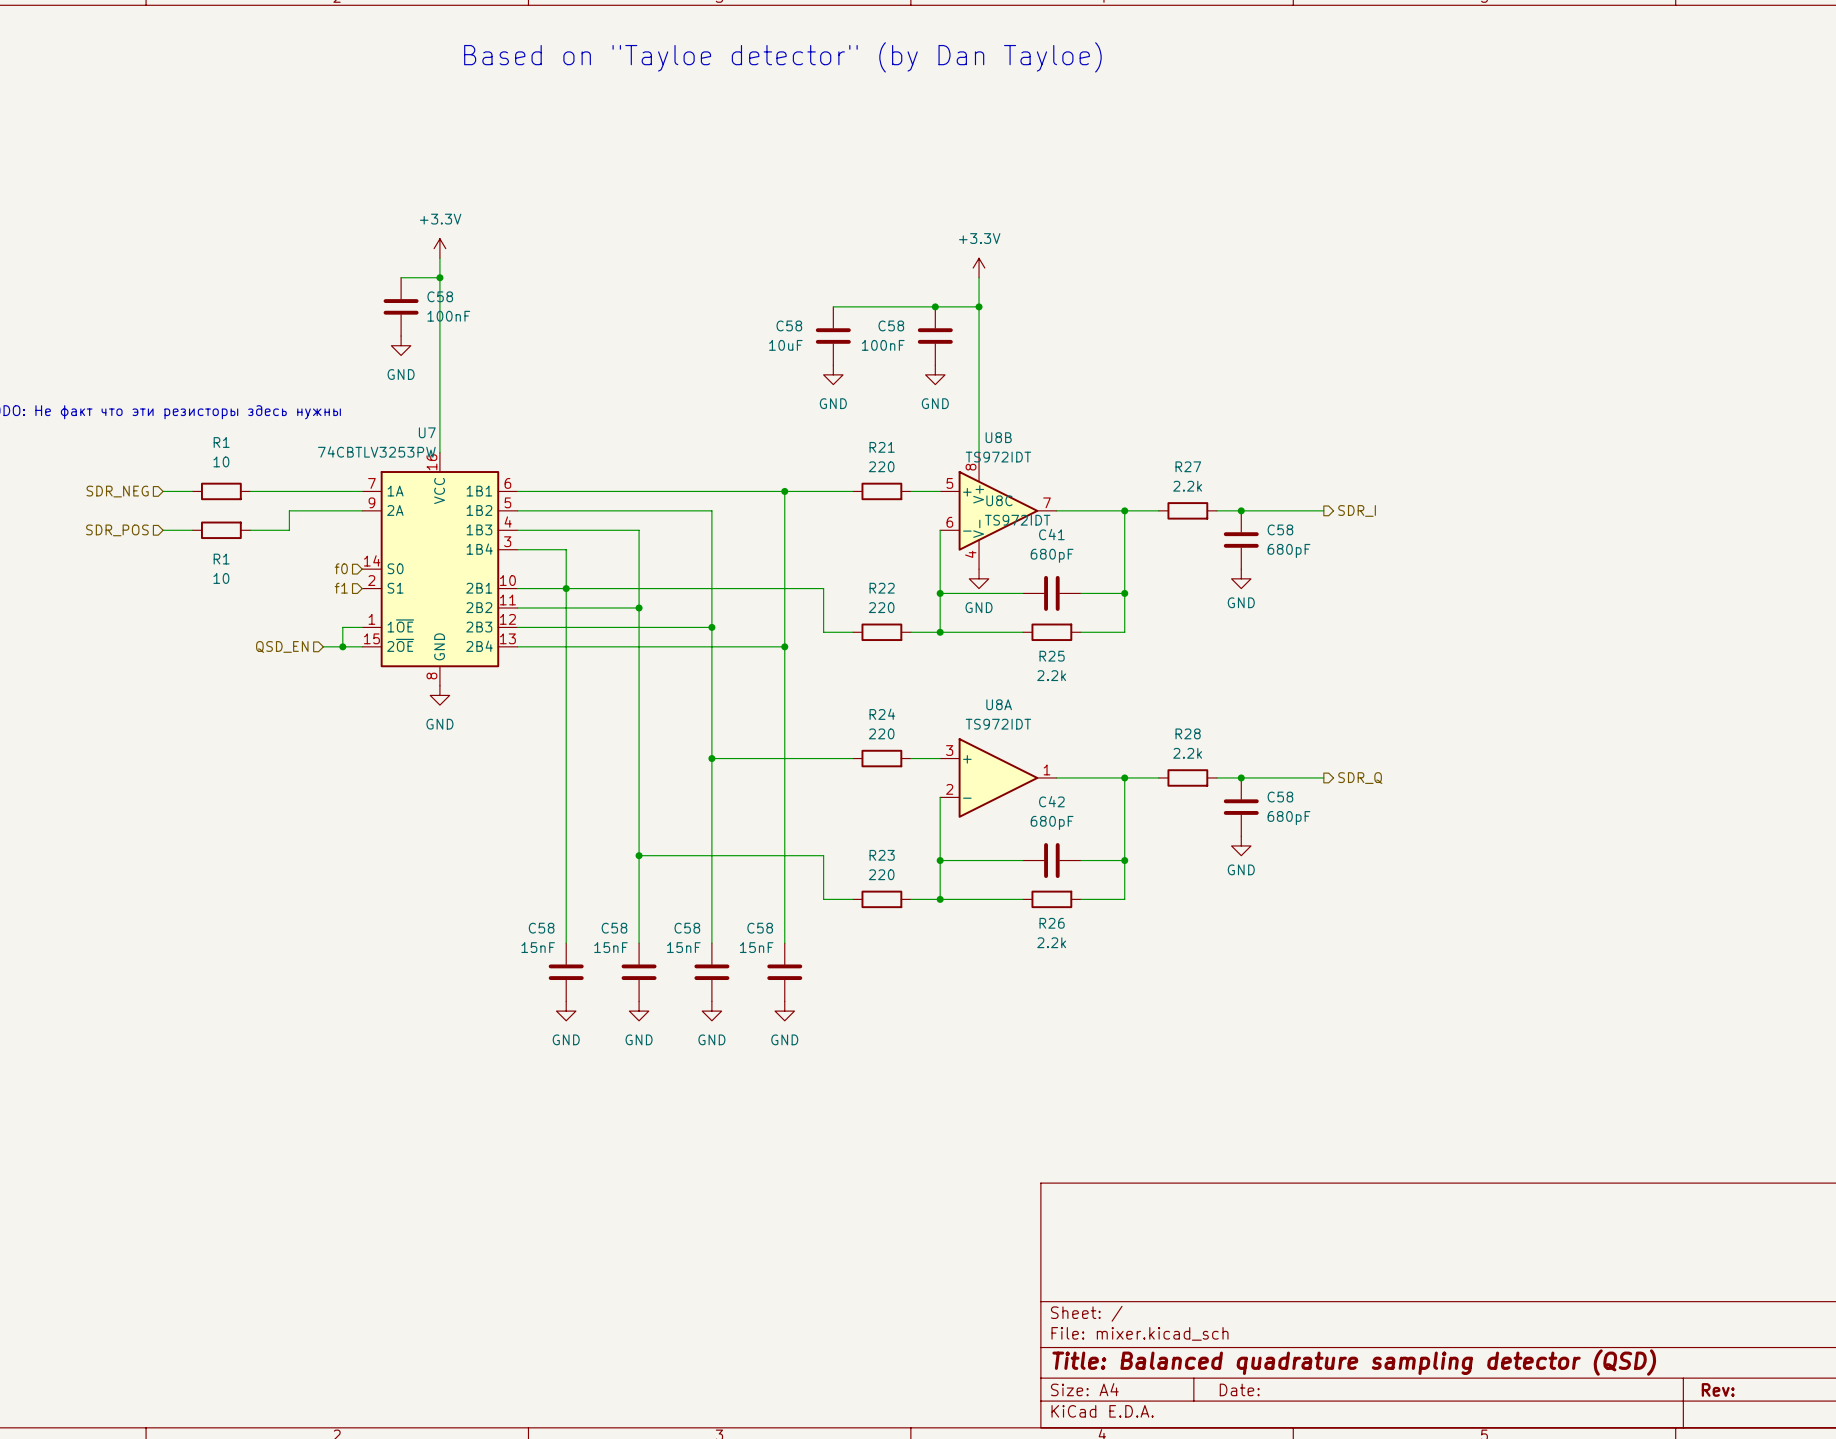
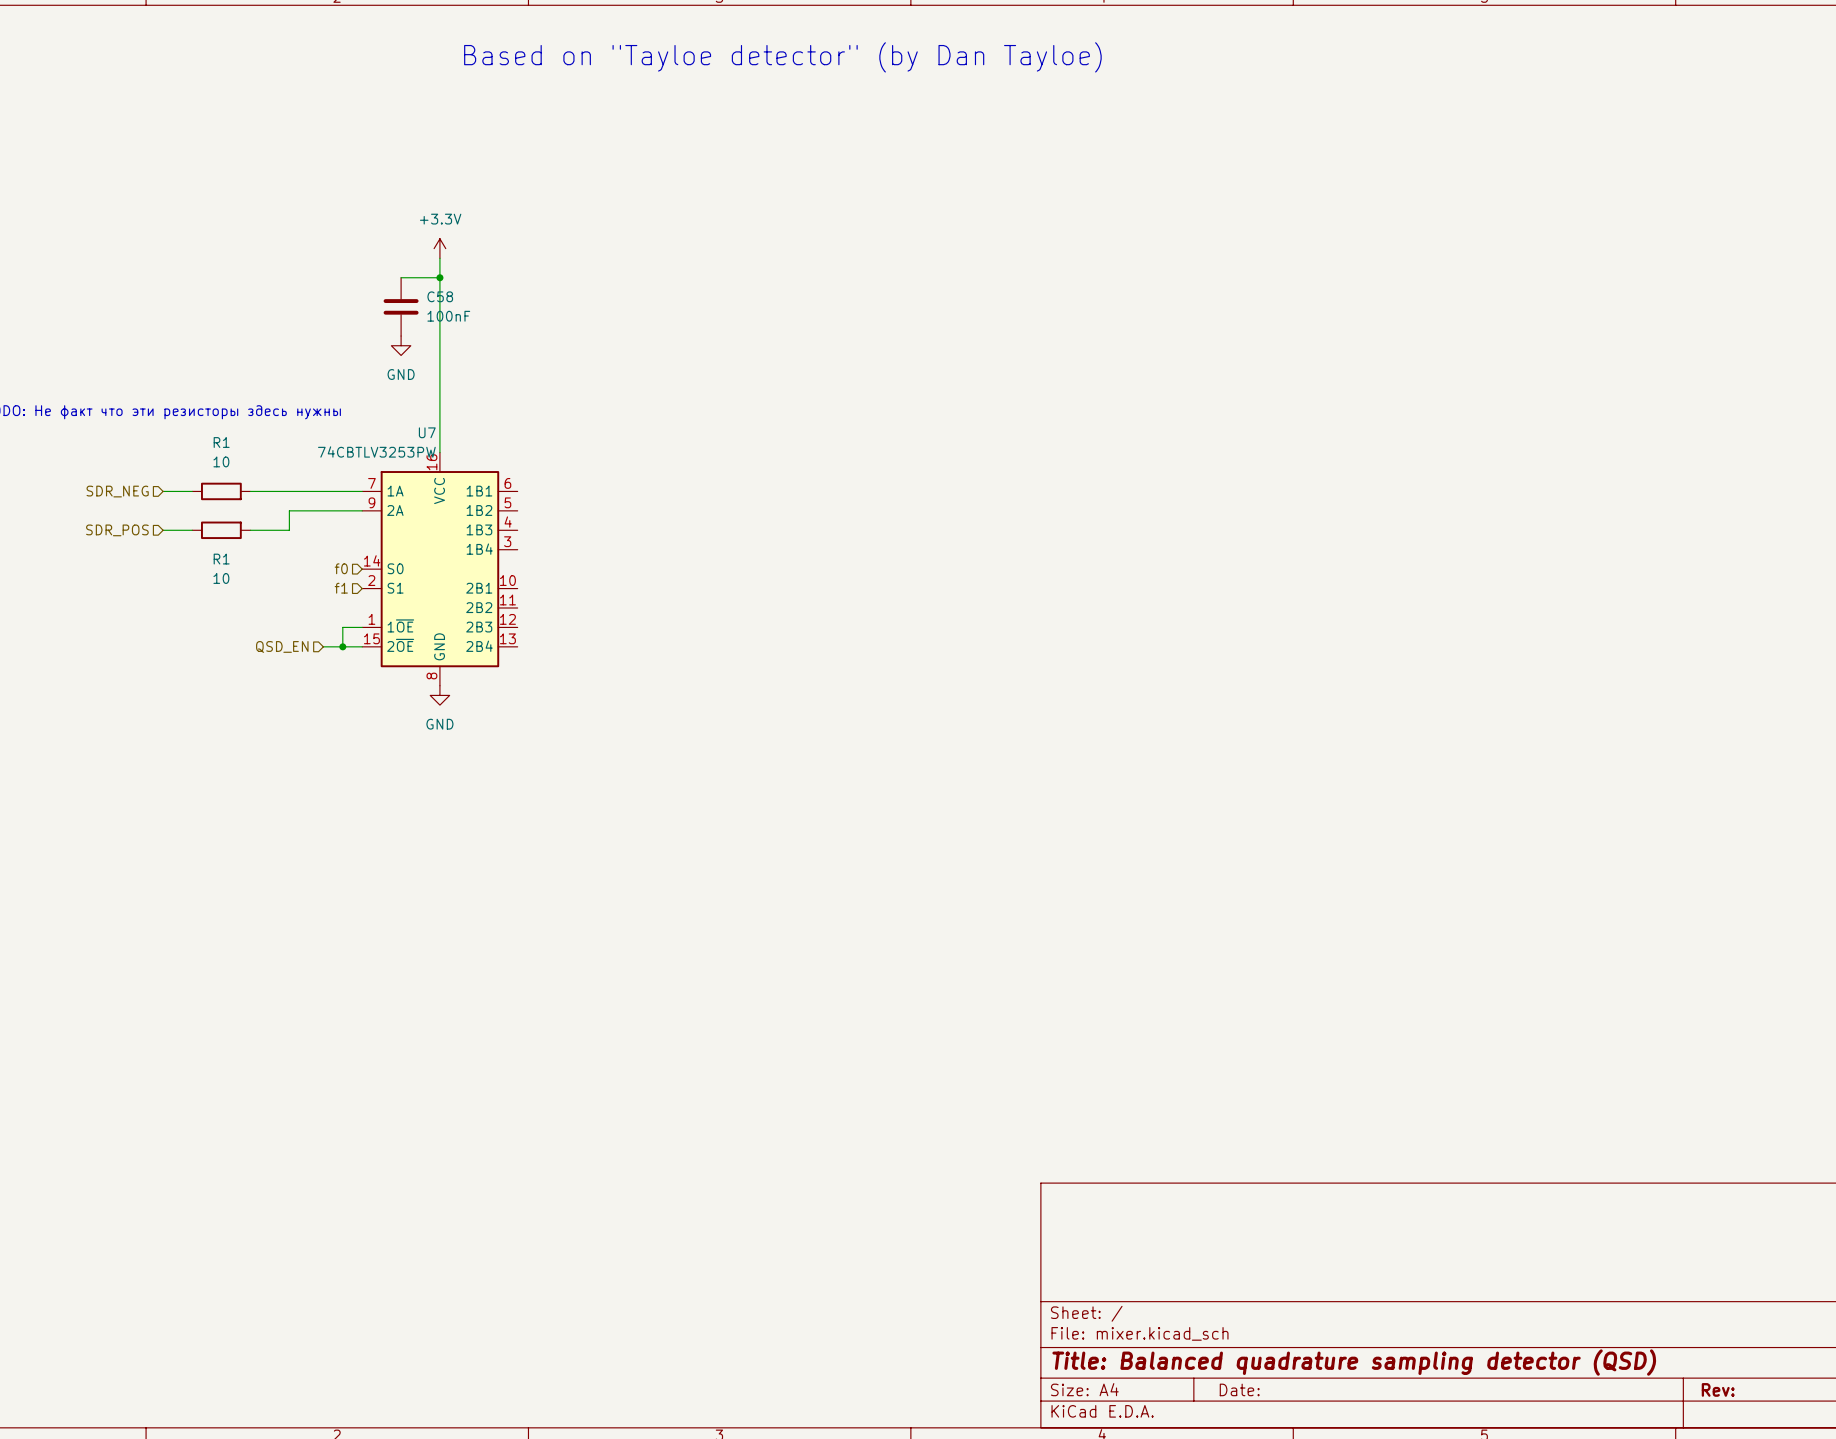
power symbol: +3.3V (979, 268) -> none
wire: (979, 277) (979, 452) -> none
wire: (833, 306) (979, 306) -> none
junction: (935, 306) -> none
junction: (979, 306) -> none
C58: 10uF (833, 336) -> none
C58: 100nF (935, 336) -> none
power symbol: GND (833, 374) -> none
power symbol: GND (935, 374) -> none
wire: (517, 491) (852, 491) -> none
wire: (784, 491) (784, 943) -> none
junction: (784, 491) -> none
R21: 220 (881, 491) -> none
wire: (911, 491) (940, 491) -> none
wire: (517, 510) (711, 510) (711, 943) -> none
U8C: TS972IDT (979, 510) -> none
U8B: TS972IDT (998, 510) -> none
wire: (1056, 510) (1158, 510) -> none
wire: (1124, 510) (1124, 632) (1081, 632) -> none
junction: (1124, 510) -> none
R27: 2.2k (1187, 510) -> none
wire: (1216, 510) (1323, 510) -> none
junction: (1241, 510) -> none
hierarchical label: SDR_I (1357, 510) -> none
wire: (517, 530) (639, 530) (639, 943) -> none
wire: (940, 530) (940, 632) -> none
C58: 680pF (1241, 540) -> none
wire: (517, 549) (566, 549) (566, 943) -> none
power symbol: GND (979, 578) -> none
power symbol: GND (1241, 578) -> none
wire: (517, 588) (823, 588) (823, 632) (852, 632) -> none
junction: (566, 588) -> none
wire: (940, 593) (1022, 593) -> none
junction: (940, 593) -> none
C41: 680pF (1051, 593) -> none
wire: (1081, 593) (1124, 593) -> none
junction: (1124, 593) -> none
wire: (517, 607) (639, 607) -> none
junction: (639, 607) -> none
wire: (517, 627) (711, 627) -> none
junction: (711, 627) -> none
R22: 220 (881, 632) -> none
wire: (911, 632) (1022, 632) -> none
junction: (940, 632) -> none
R25: 2.2k (1051, 632) -> none
wire: (517, 646) (784, 646) -> none
junction: (784, 646) -> none
wire: (711, 758) (852, 758) -> none
junction: (711, 758) -> none
R24: 220 (881, 758) -> none
wire: (911, 758) (940, 758) -> none
U8A: TS972IDT (998, 777) -> none
wire: (1056, 777) (1158, 777) -> none
wire: (1124, 777) (1124, 899) (1081, 899) -> none
junction: (1124, 777) -> none
R28: 2.2k (1187, 777) -> none
wire: (1216, 777) (1323, 777) -> none
junction: (1241, 777) -> none
hierarchical label: SDR_Q (1360, 778) -> none
wire: (940, 797) (940, 899) -> none
C58: 680pF (1241, 807) -> none
power symbol: GND (1241, 845) -> none
wire: (639, 855) (823, 855) (823, 899) (852, 899) -> none
junction: (639, 855) -> none
wire: (940, 860) (1022, 860) -> none
junction: (940, 860) -> none
C42: 680pF (1051, 860) -> none
wire: (1081, 860) (1124, 860) -> none
junction: (1124, 860) -> none
R23: 220 (881, 899) -> none
wire: (911, 899) (1022, 899) -> none
junction: (940, 899) -> none
R26: 2.2k (1051, 899) -> none
C58: 15nF (566, 972) -> none
C58: 15nF (639, 972) -> none
C58: 15nF (711, 972) -> none
C58: 15nF (784, 972) -> none
power symbol: GND (566, 1011) -> none
power symbol: GND (639, 1011) -> none
power symbol: GND (711, 1011) -> none
power symbol: GND (784, 1011) -> none

